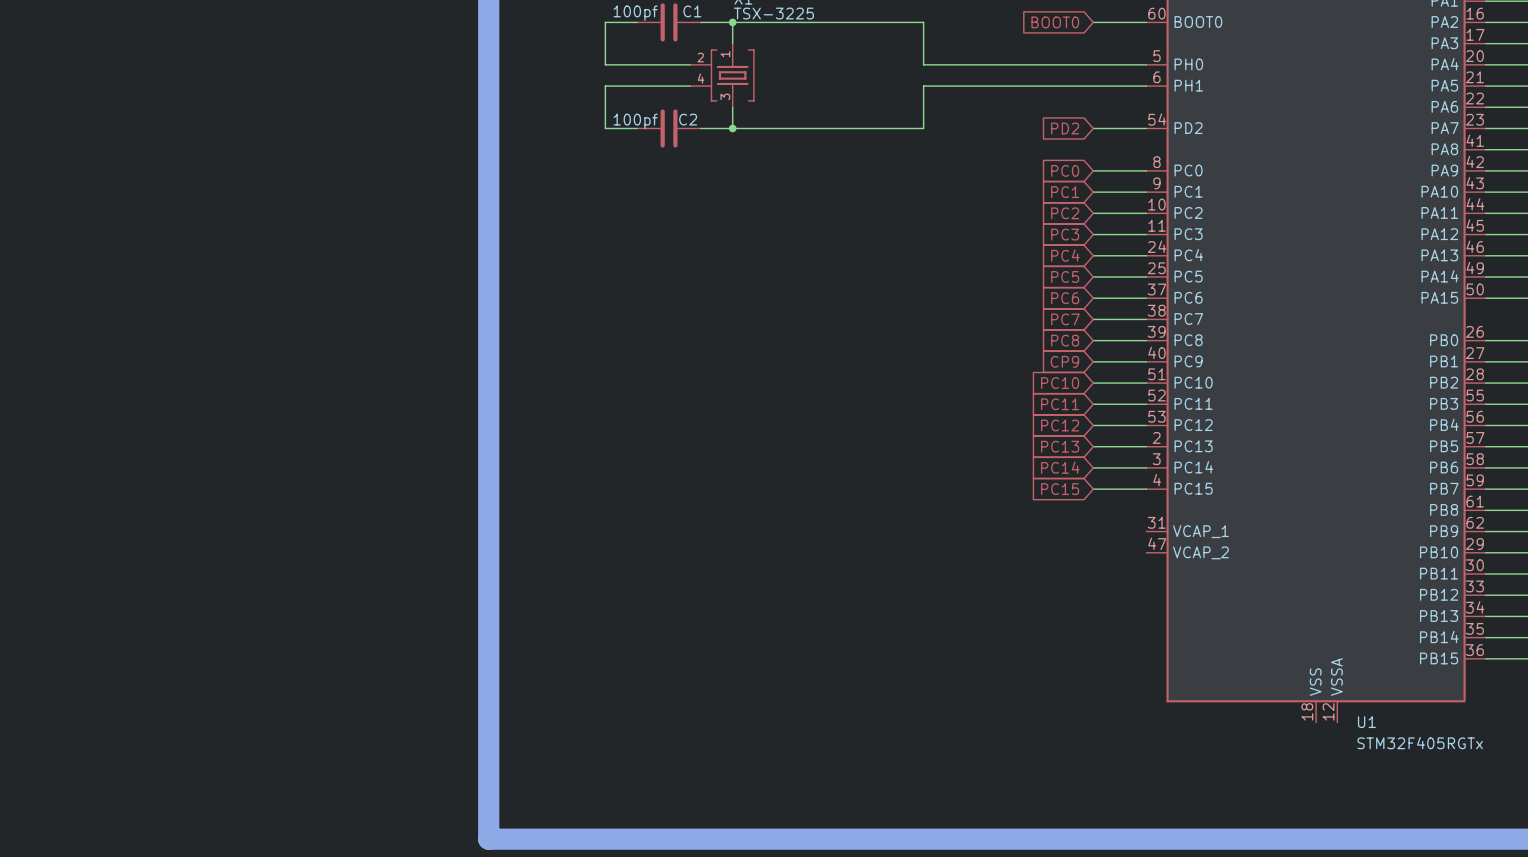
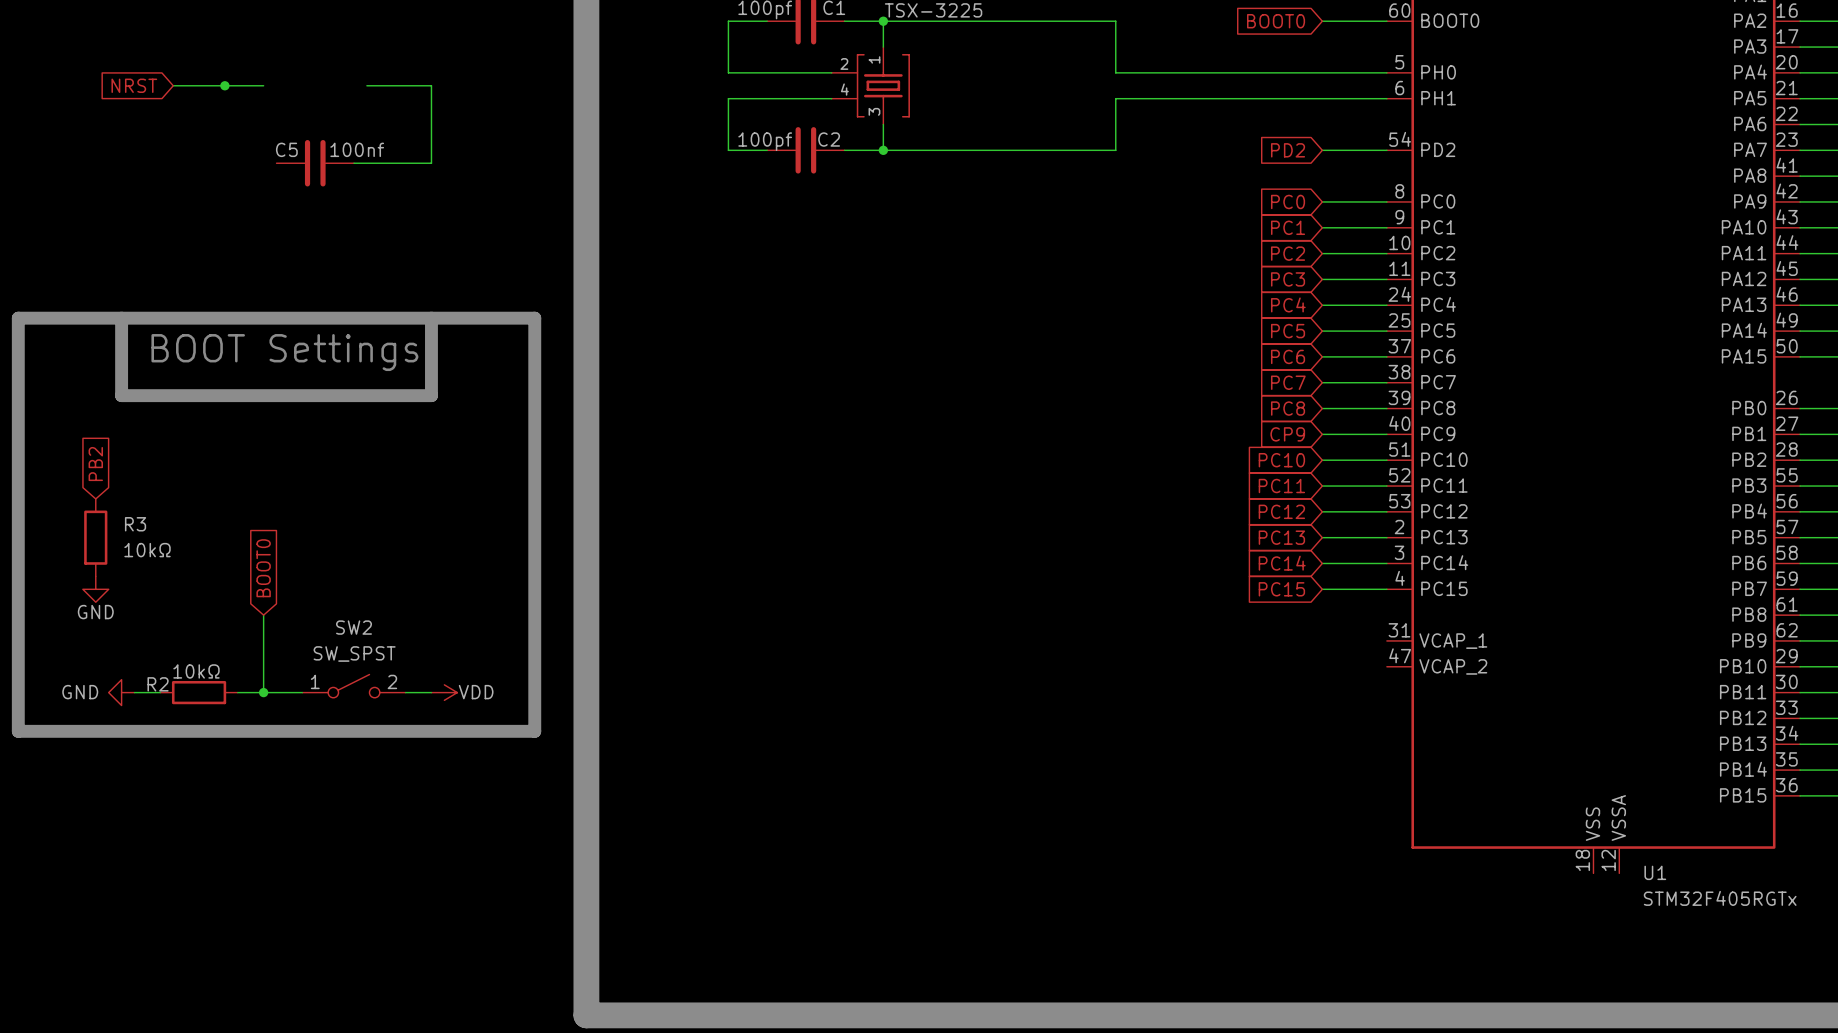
global label: none -> NRST (134, 85)
wire: none -> (173, 85) (263, 85)
junction: none -> (224, 85)
wire: none -> (366, 85) (431, 85) (431, 163) (354, 163)
C5: none -> 100nf (315, 163)
line: none -> (18, 318) (534, 318) (534, 731) (18, 731) (18, 318)
line: none -> (121, 318) (121, 395) (431, 395) (431, 318)
text: none -> BOOT Settings (284, 352)
global label: none -> PB2 (95, 464)
R3: none -> 10kΩ (95, 537)
global label: none -> BOOT0 (263, 568)
power symbol: none -> GND (95, 589)
wire: none -> (263, 615) (263, 692)
SW2: none -> SW_SPST (354, 686)
power symbol: none -> GND (121, 692)
wire: none -> (134, 692) (160, 692)
R2: none -> 10kΩ (199, 692)
wire: none -> (237, 692) (302, 692)
junction: none -> (263, 692)
wire: none -> (405, 692) (431, 692)
power symbol: none -> VDD (444, 692)

